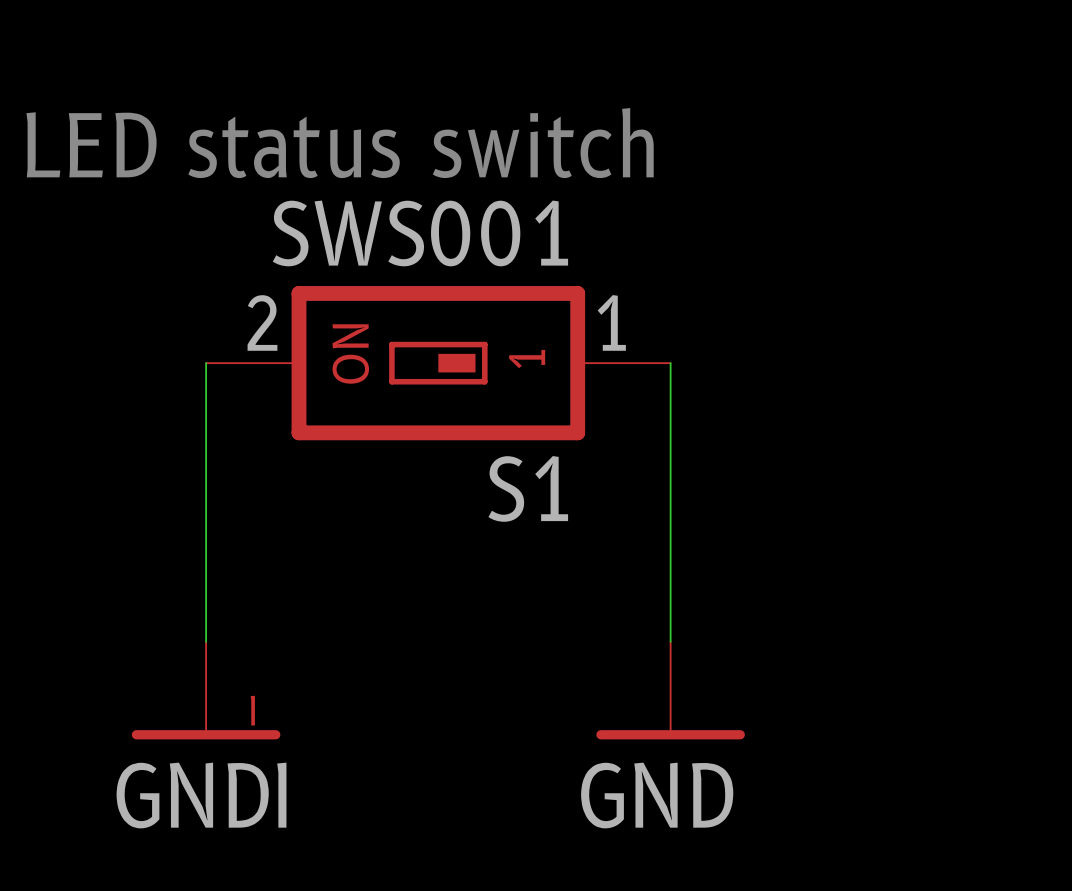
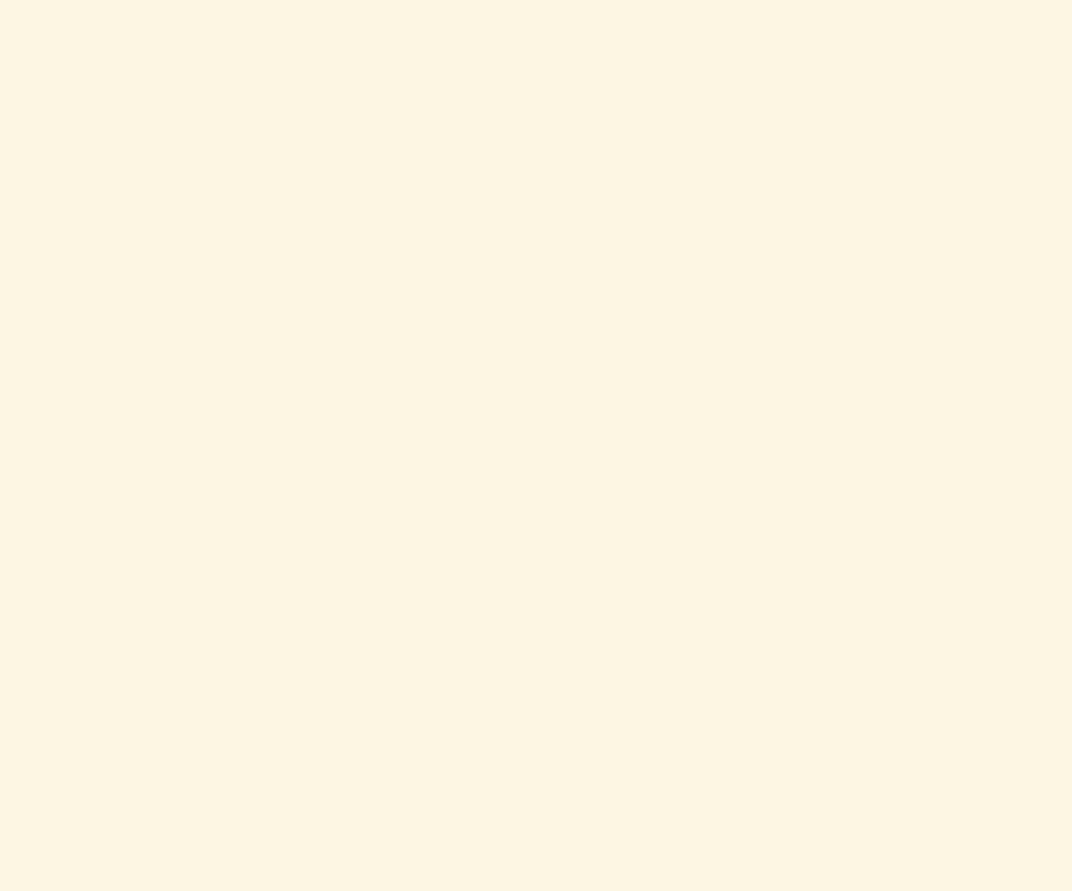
text: LED status switch (340, 143) -> none
wire: (206, 363) (206, 641) -> none
S1: SWS001 (438, 363) -> none
wire: (670, 363) (670, 641) -> none
power symbol: GNDI (206, 690) -> none
power symbol: GND (670, 690) -> none

